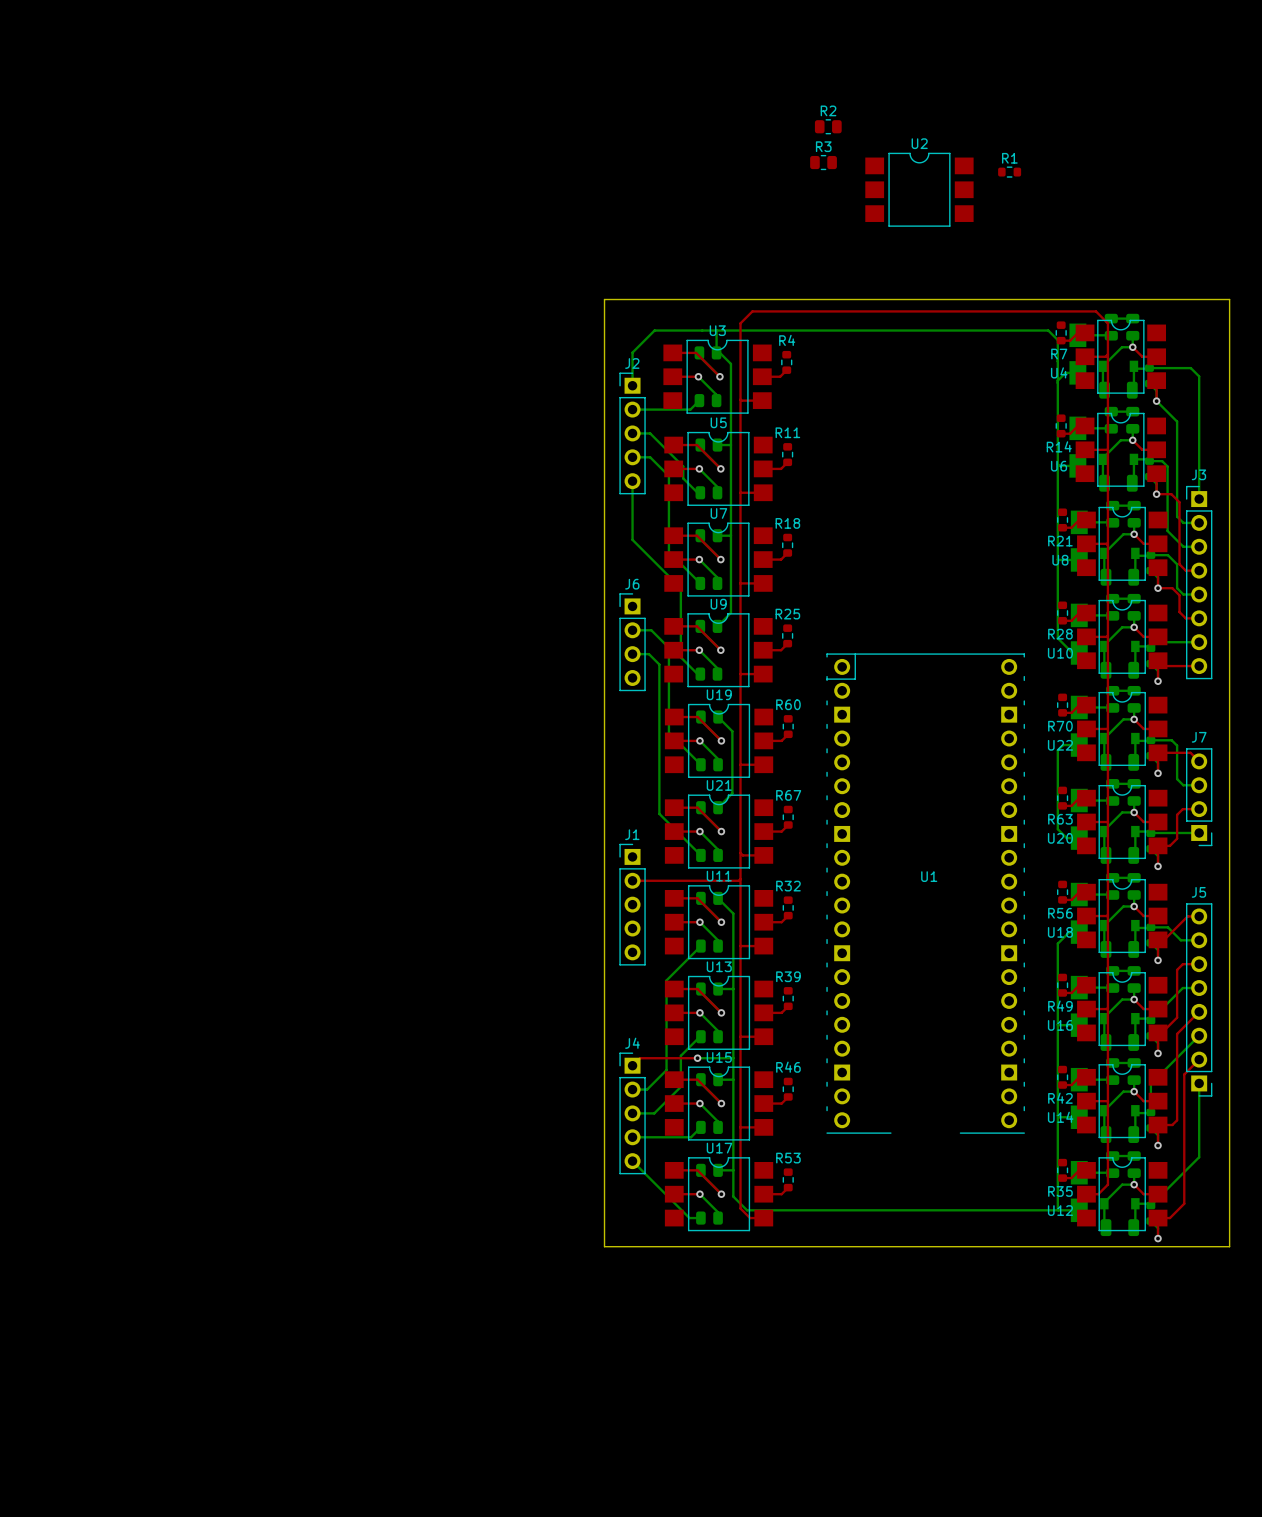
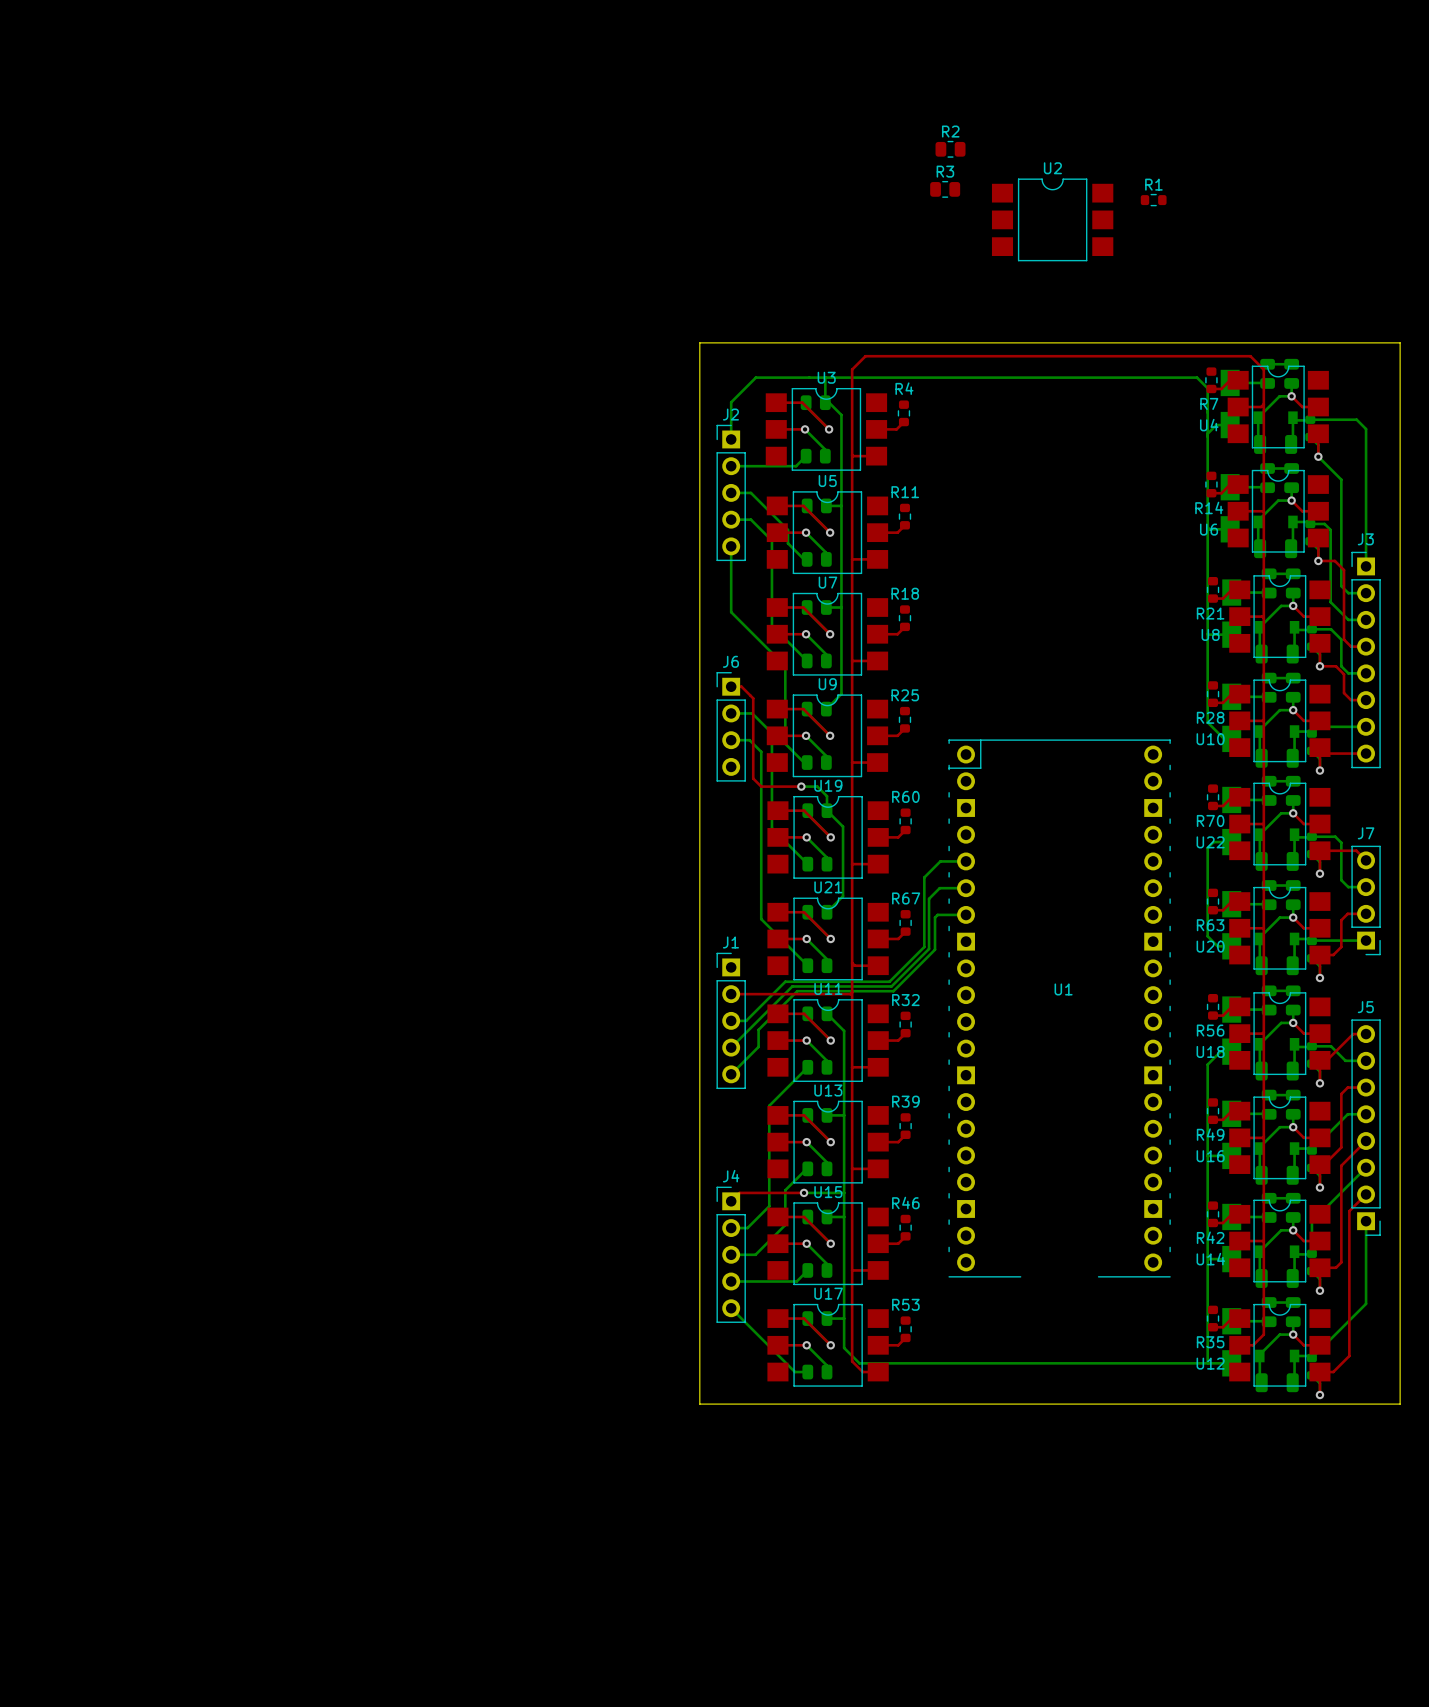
top track: none -> (731, 686) (741, 686) (753, 698) (753, 778) (761, 786) (801, 786)
bottom track: none -> (801, 786) (817, 786) (827, 796) (827, 810)
via: none -> (801, 786)
bottom track: none -> (966, 861) (940, 861) (924, 877) (924, 946) (889, 981) (785, 981) (746, 1020) (731, 1020)
bottom track: none -> (966, 888) (939, 888) (929, 898) (929, 948) (891, 986) (792, 986) (731, 1047)
bottom track: none -> (966, 914) (937, 914) (935, 917) (935, 949) (893, 991) (797, 991) (758, 1029) (758, 1046) (731, 1074)

